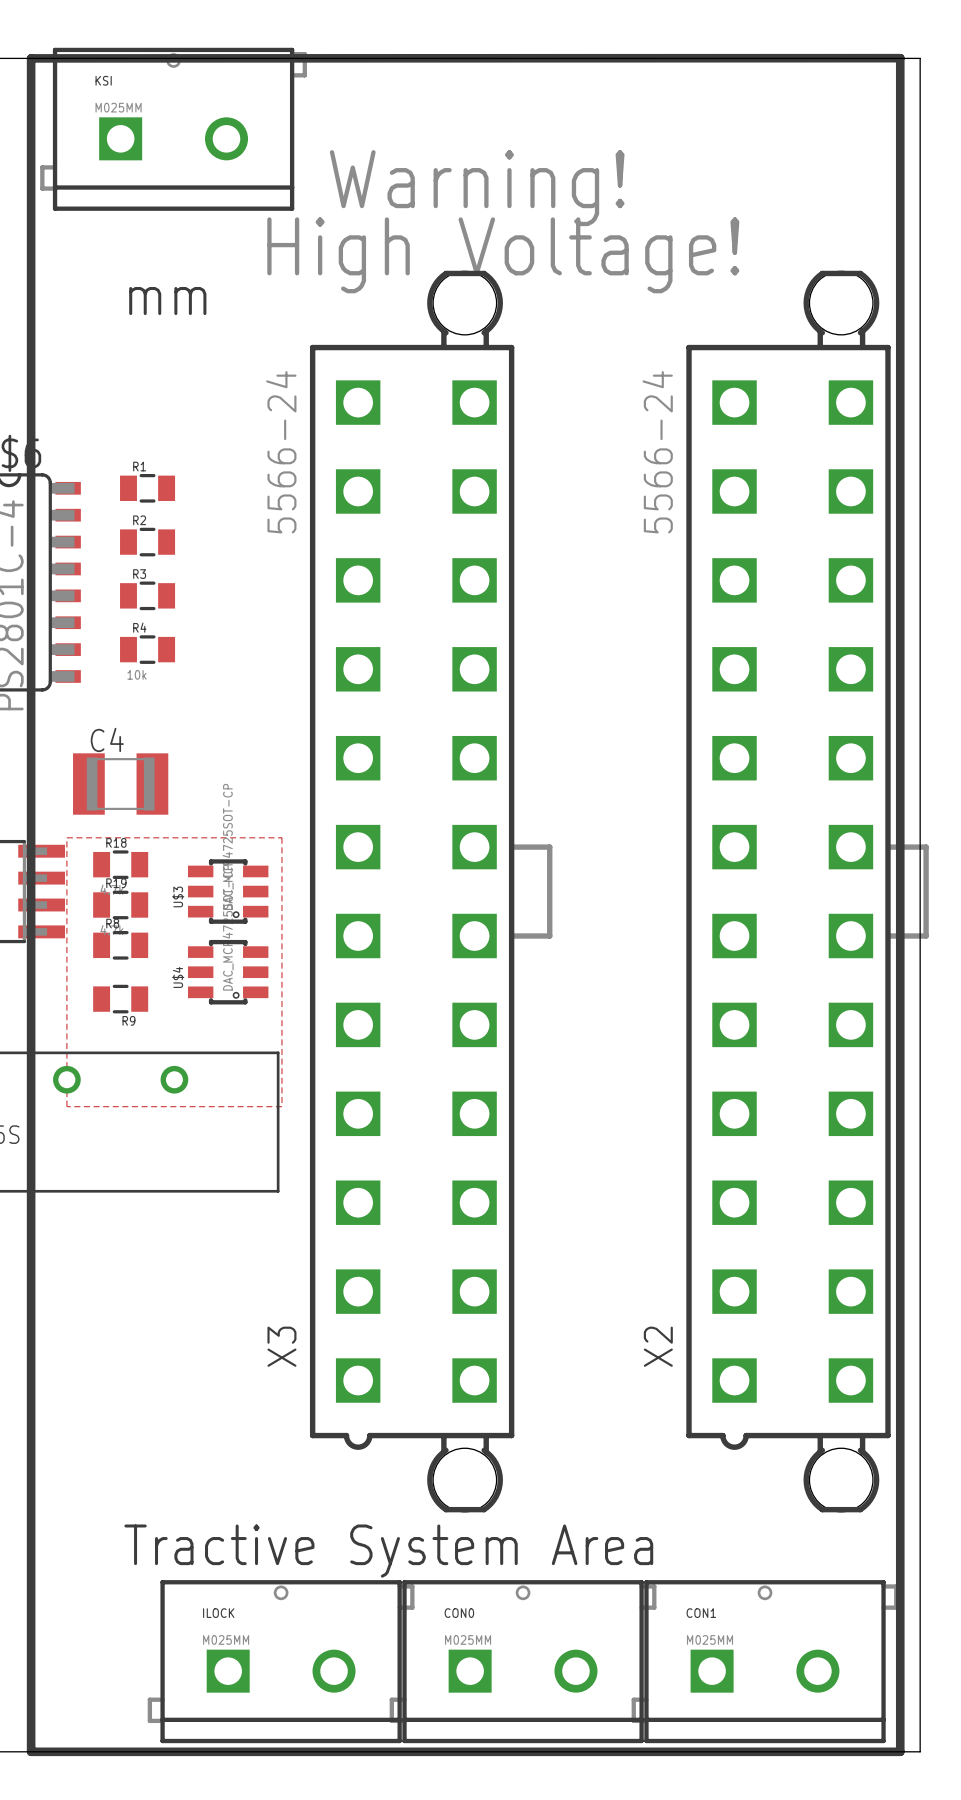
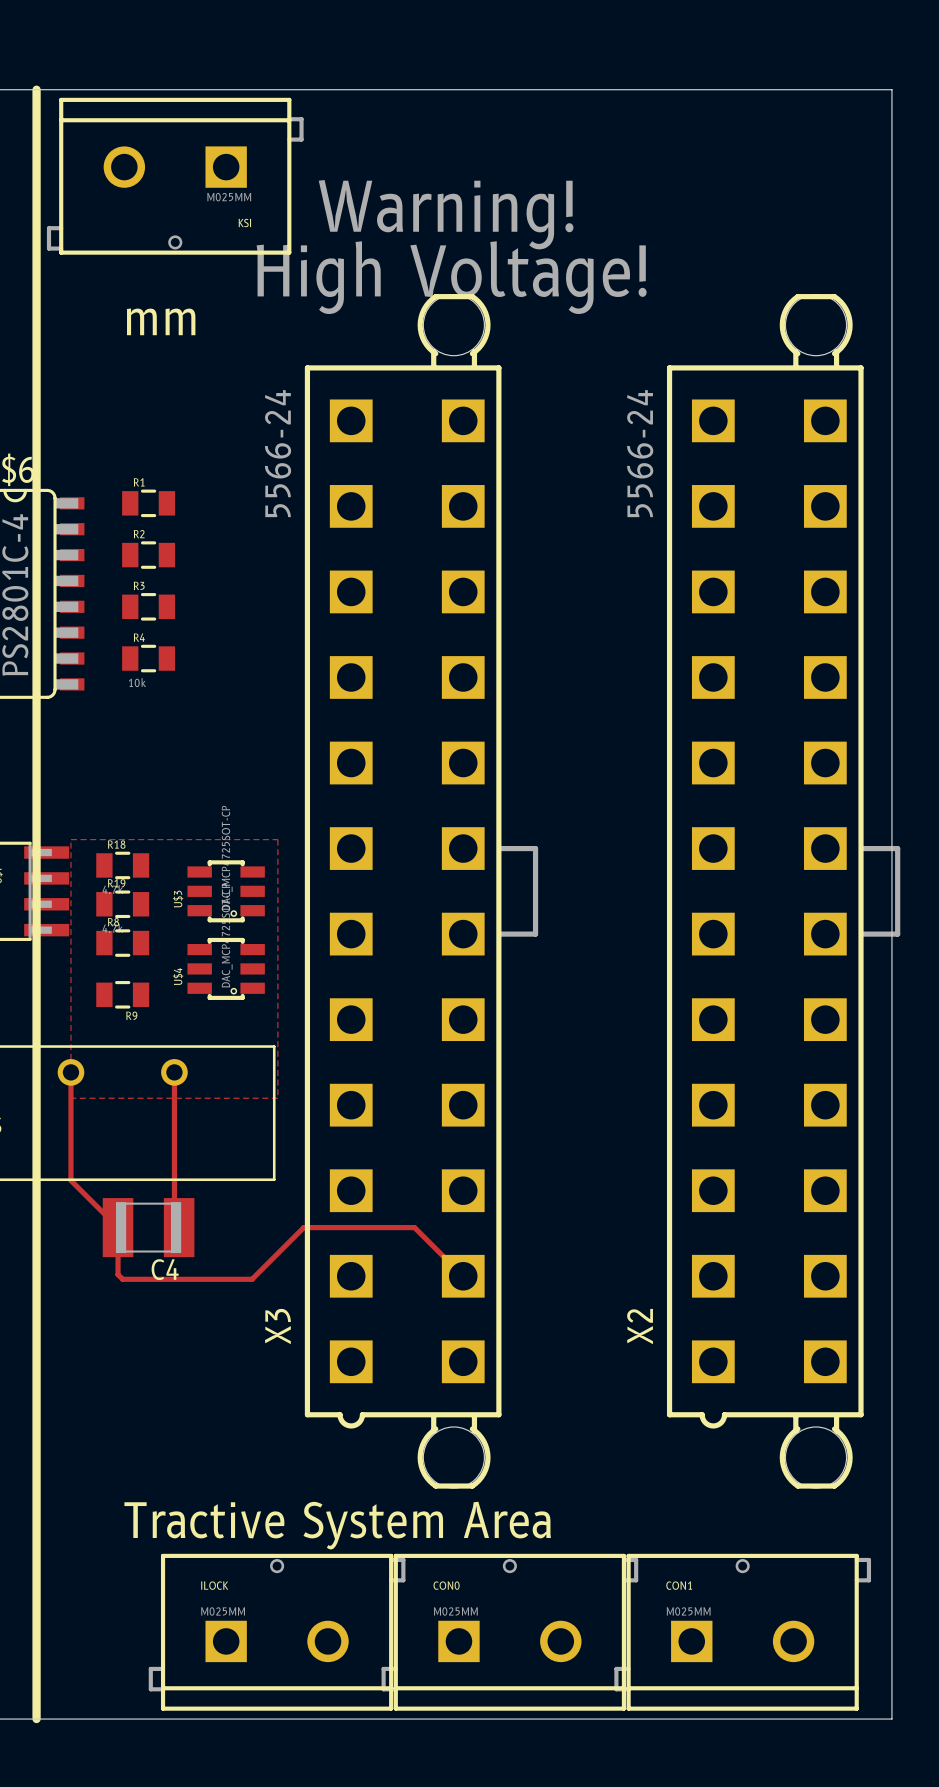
line: (31, 58) (900, 58) (900, 1751) (31, 1751) -> none
KSI rotation: 0° (173, 129) -> 180° (175, 176)
C4 name position: C4 (107, 739) -> C4 (165, 1269)
C4 position: (120, 784) -> (148, 1227)
track: none -> (70, 1072) (70, 1180) (118, 1227) (118, 1274) (122, 1279) (252, 1279) (303, 1227) (414, 1227) (463, 1276)
track: none -> (174, 1072) (174, 1222) (179, 1227)

